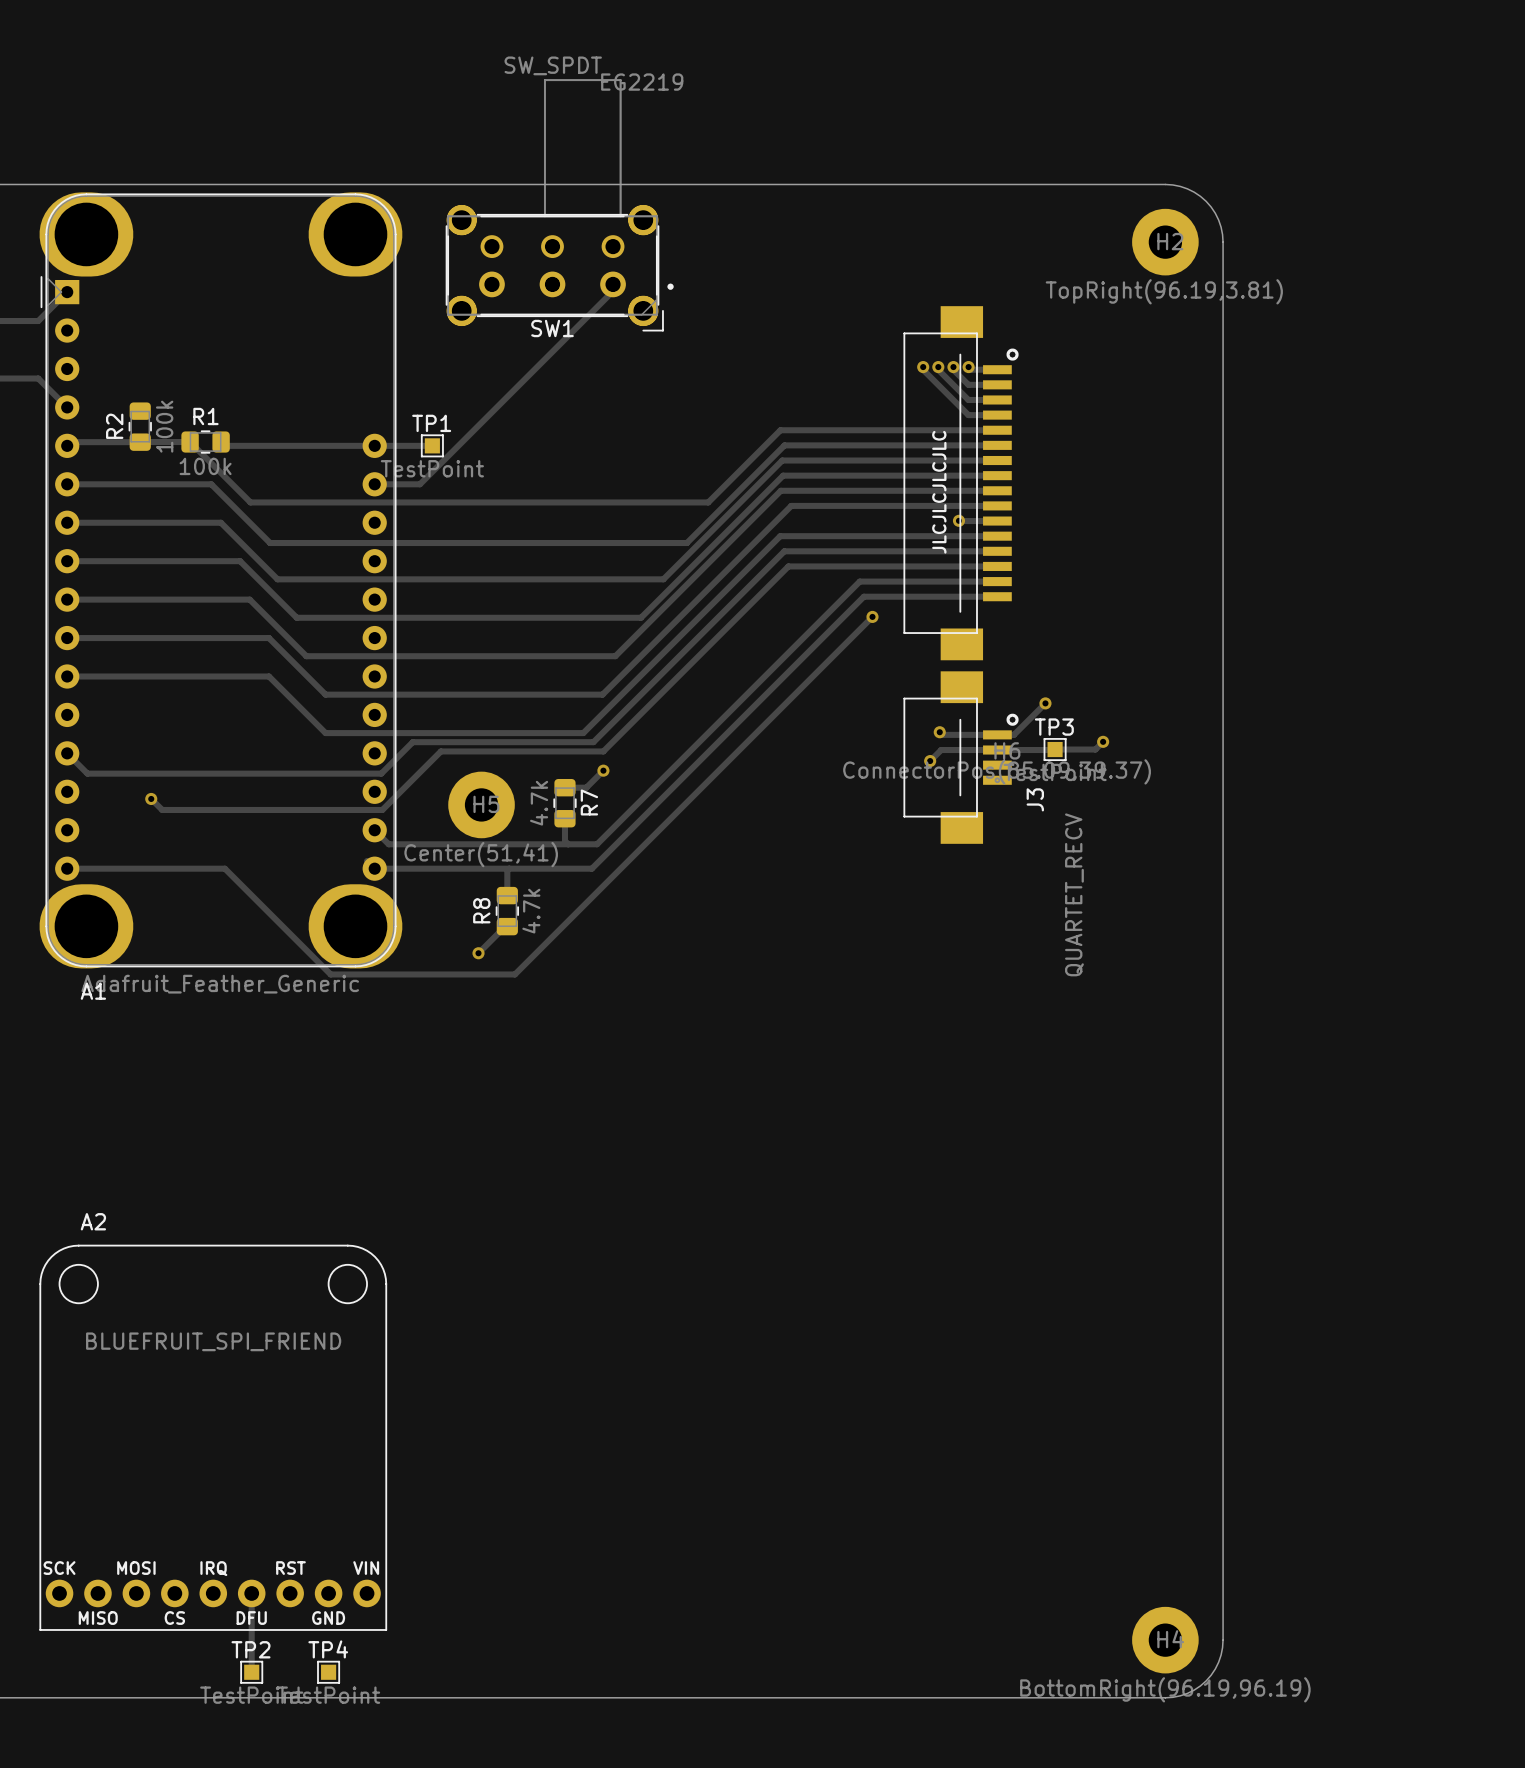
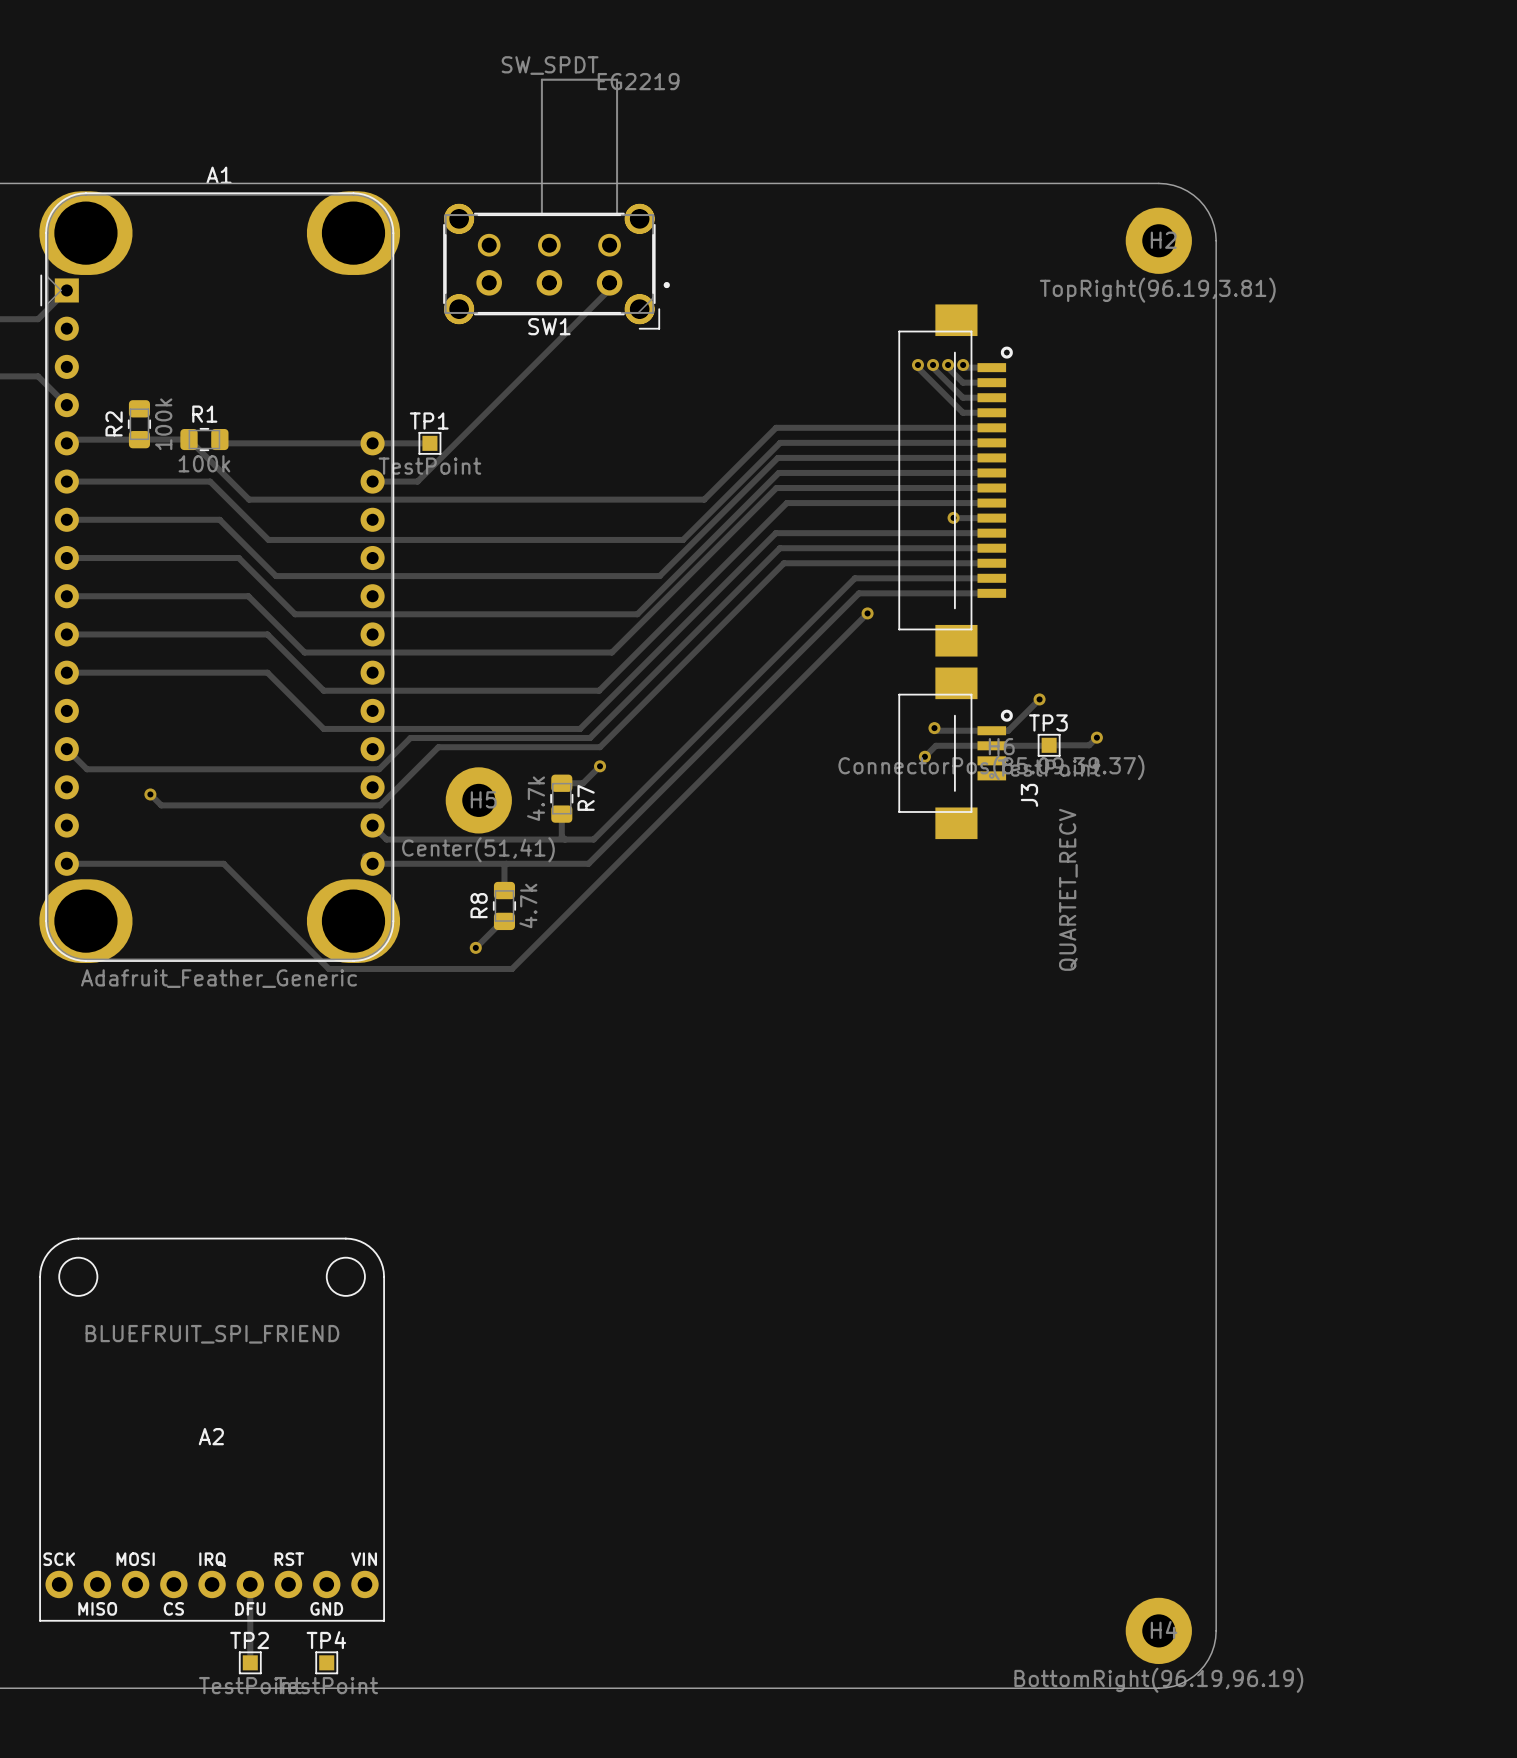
text: JLCJLCJLCJLC (939, 492) -> none
A1 name position: A1 (93, 991) -> A1 (219, 175)
A2 name position: A2 (93, 1221) -> A2 (211, 1436)

